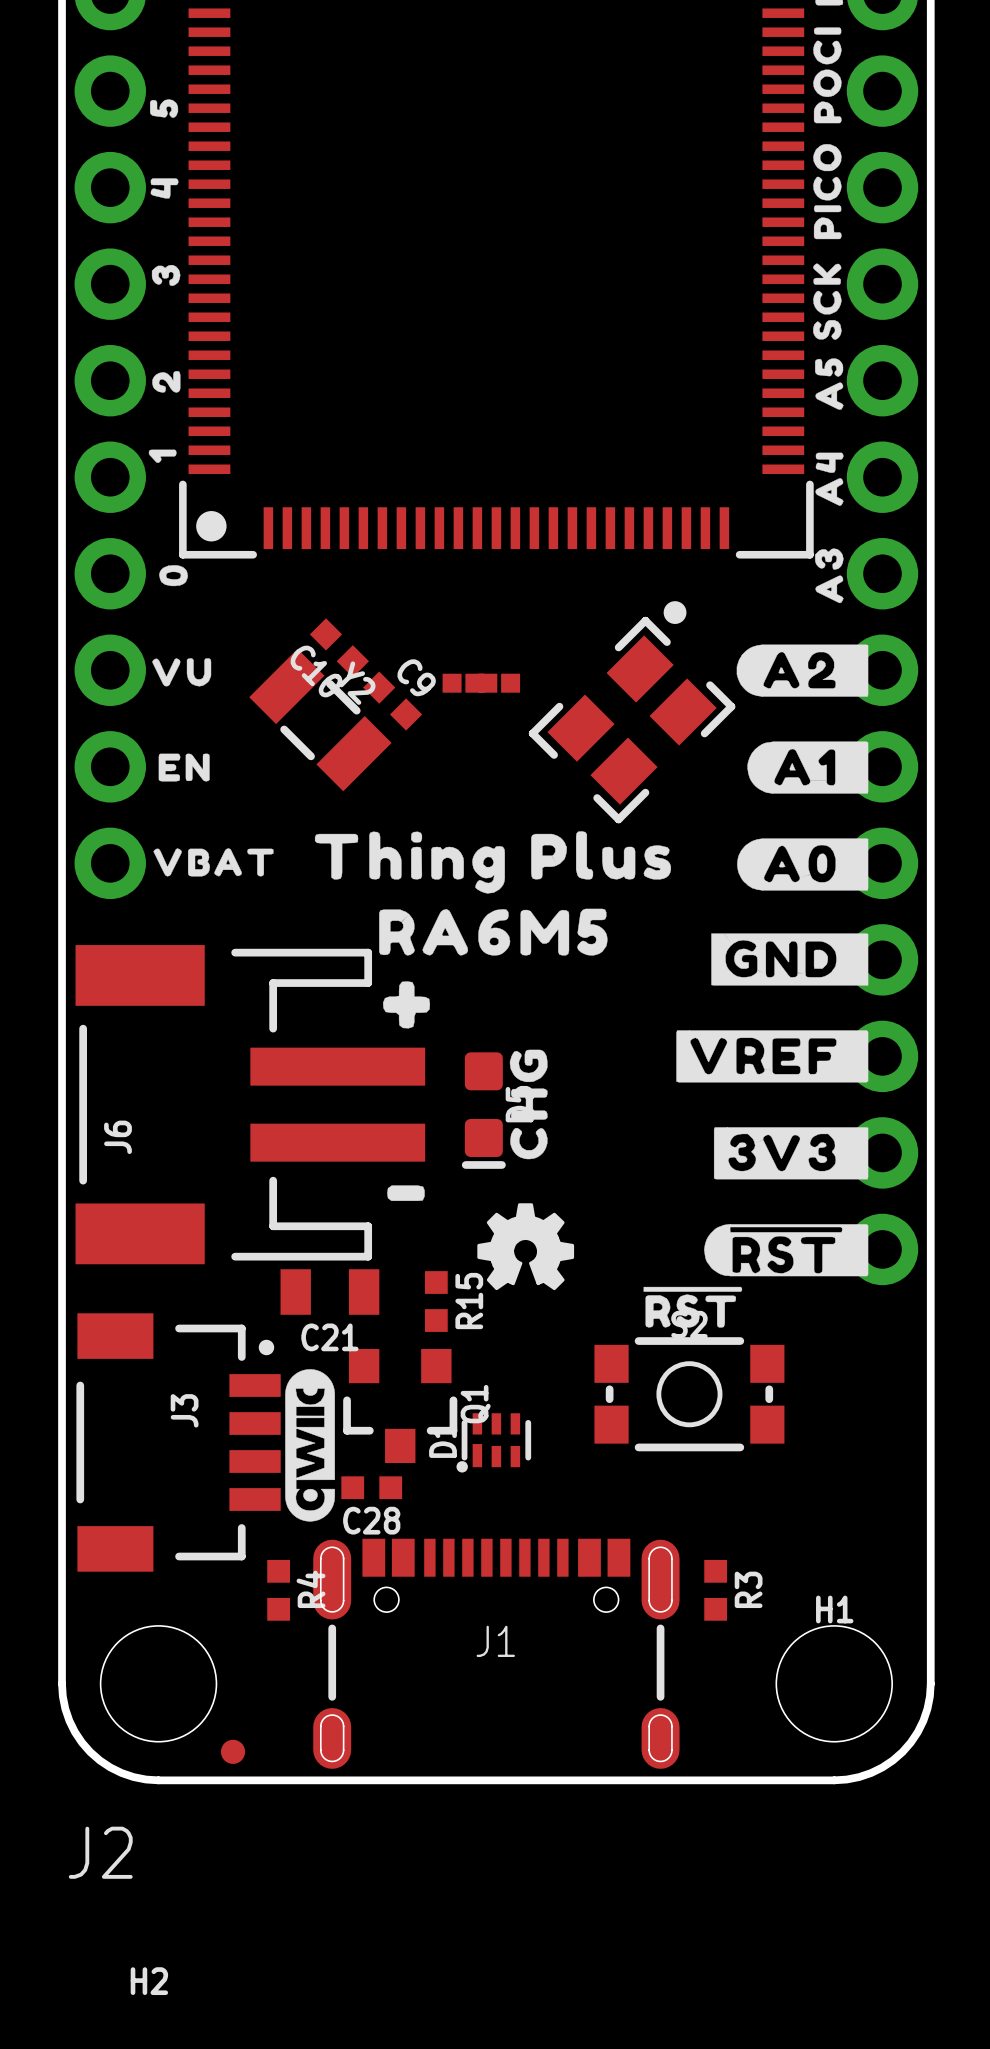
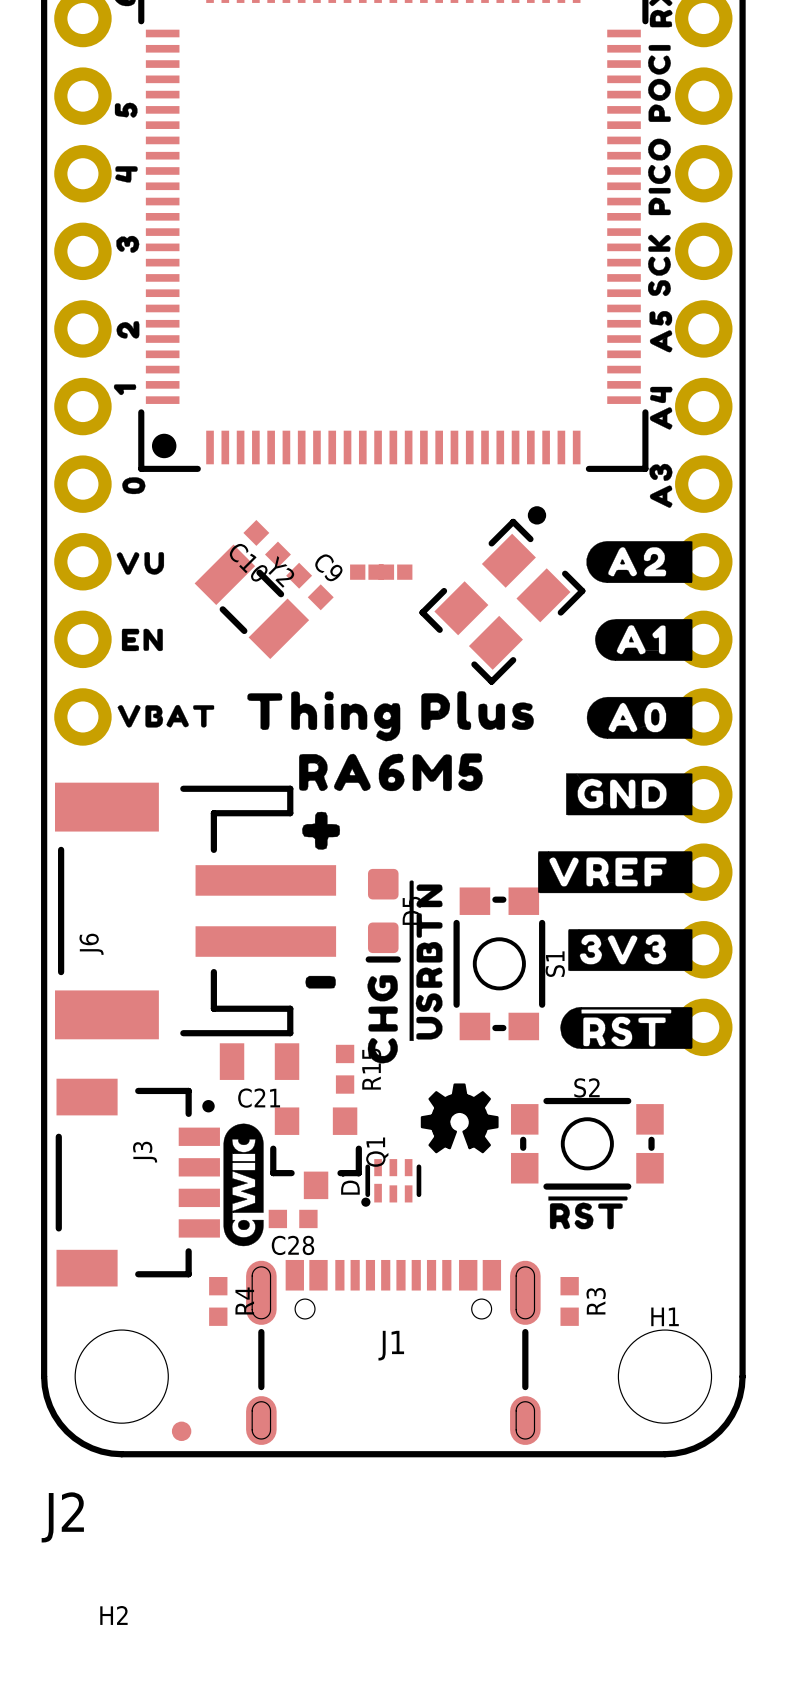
drawing: none -> [409, 880, 443, 1041]
drawing position: (528, 1104) -> (382, 1019)
S1: none -> (499, 963)
drawing position: (525, 1246) -> (459, 1118)
drawing position: (692, 1307) -> (587, 1212)
S2 position: (689, 1394) -> (587, 1143)

